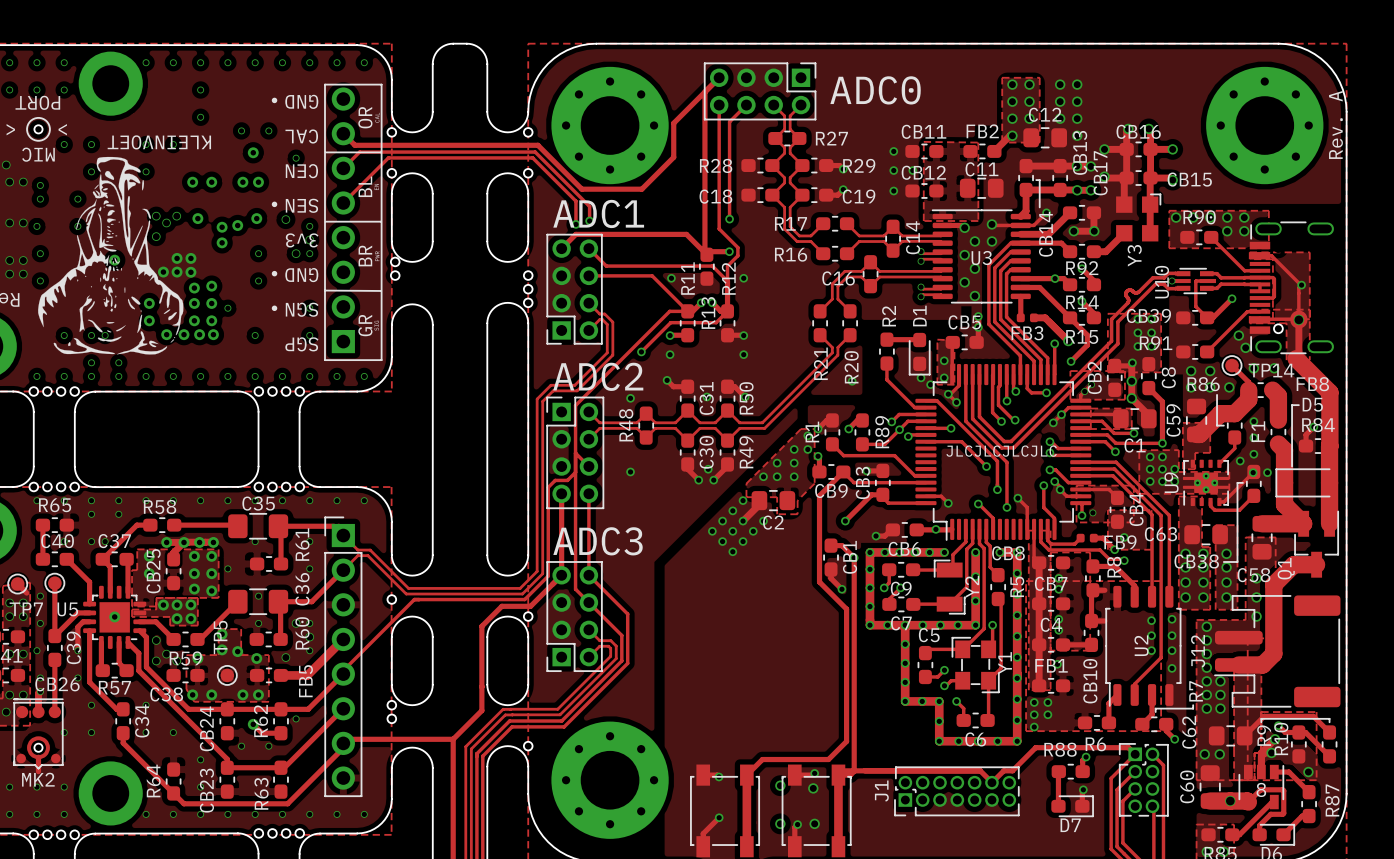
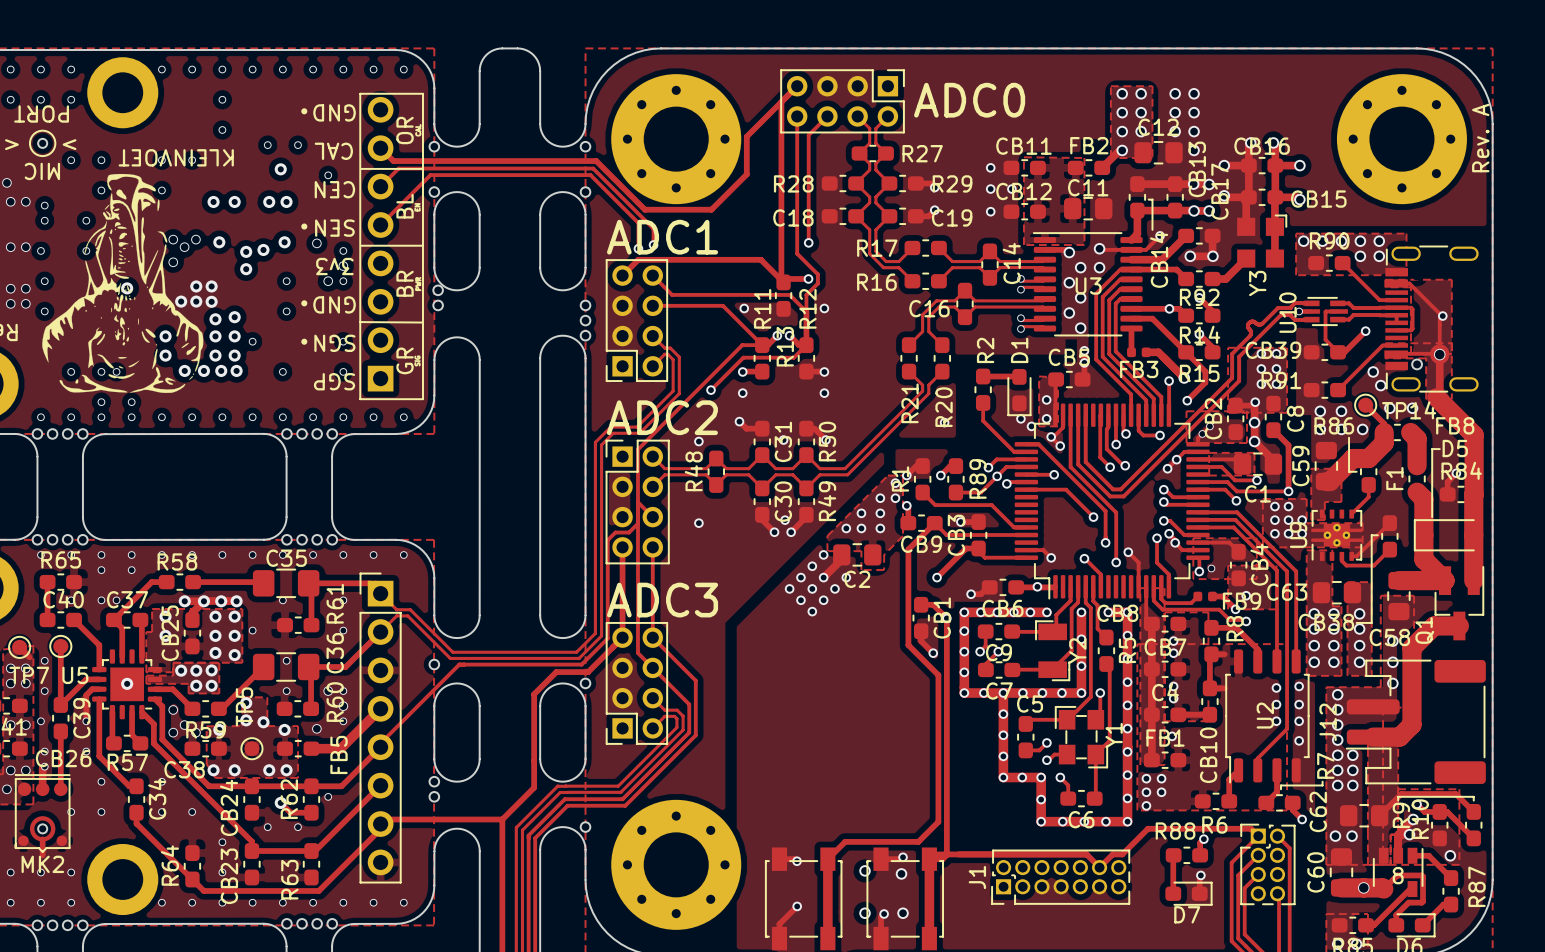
via: (1253, 421) -> none
via: (1253, 437) -> none
text: JLCJLCJLCJLC (1001, 451) -> none
via: (1253, 454) -> none
via: (1240, 461) -> none
via: (1253, 472) -> none
via: (1267, 472) -> none

